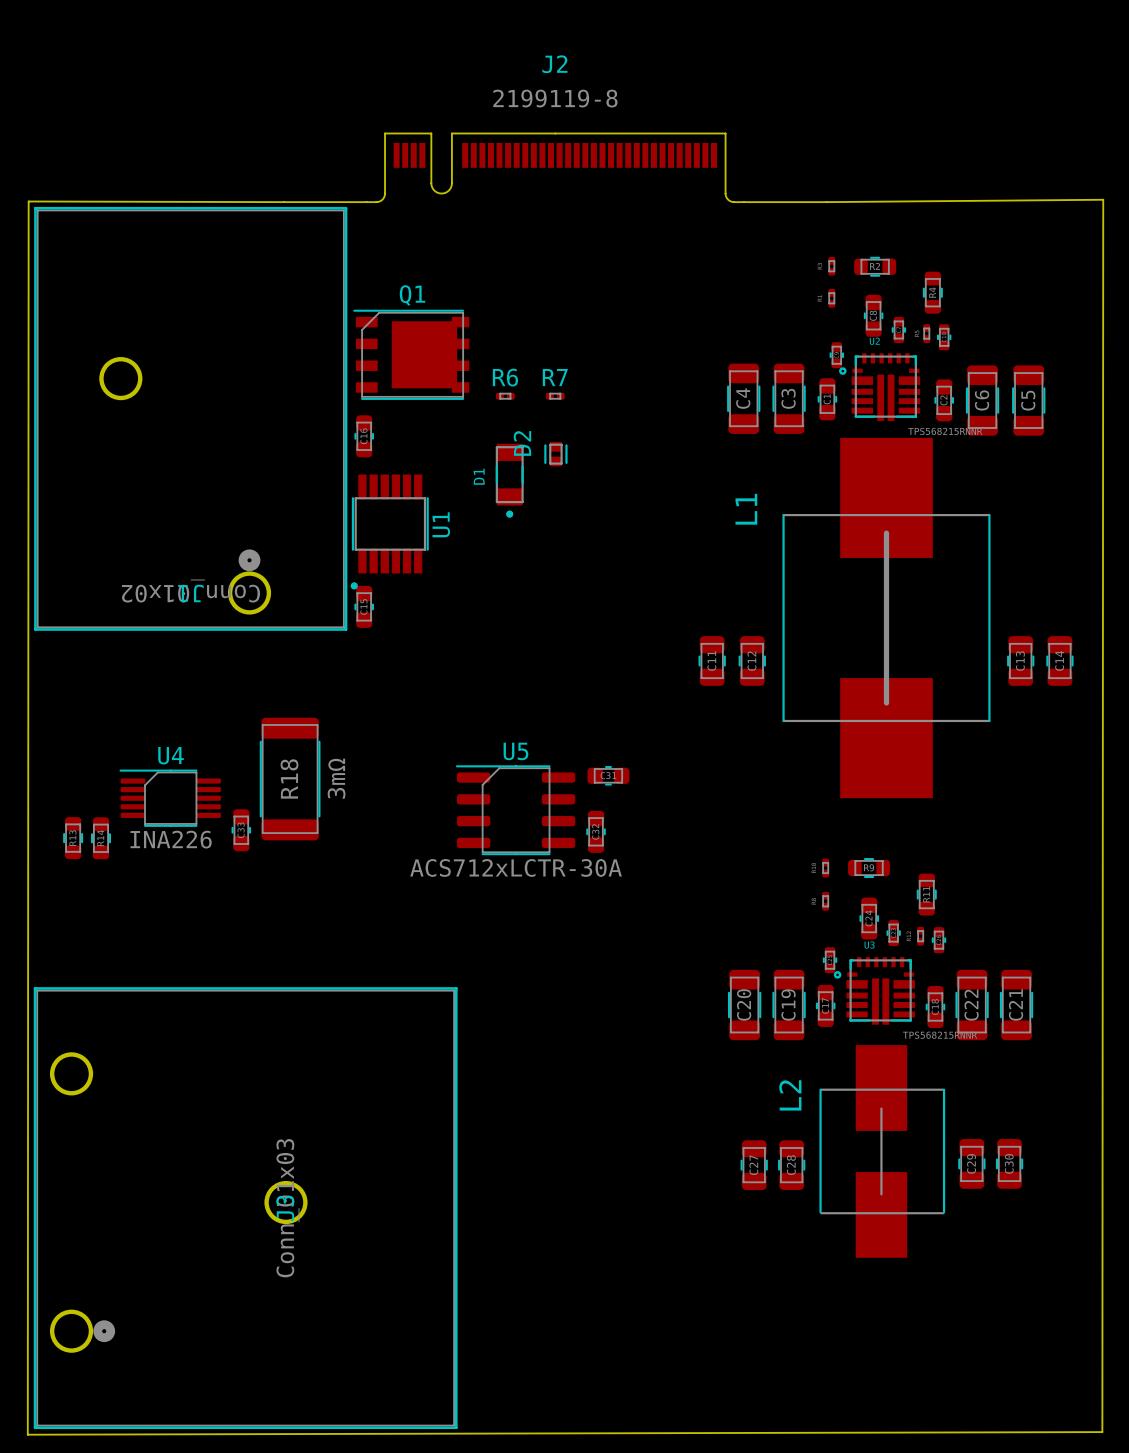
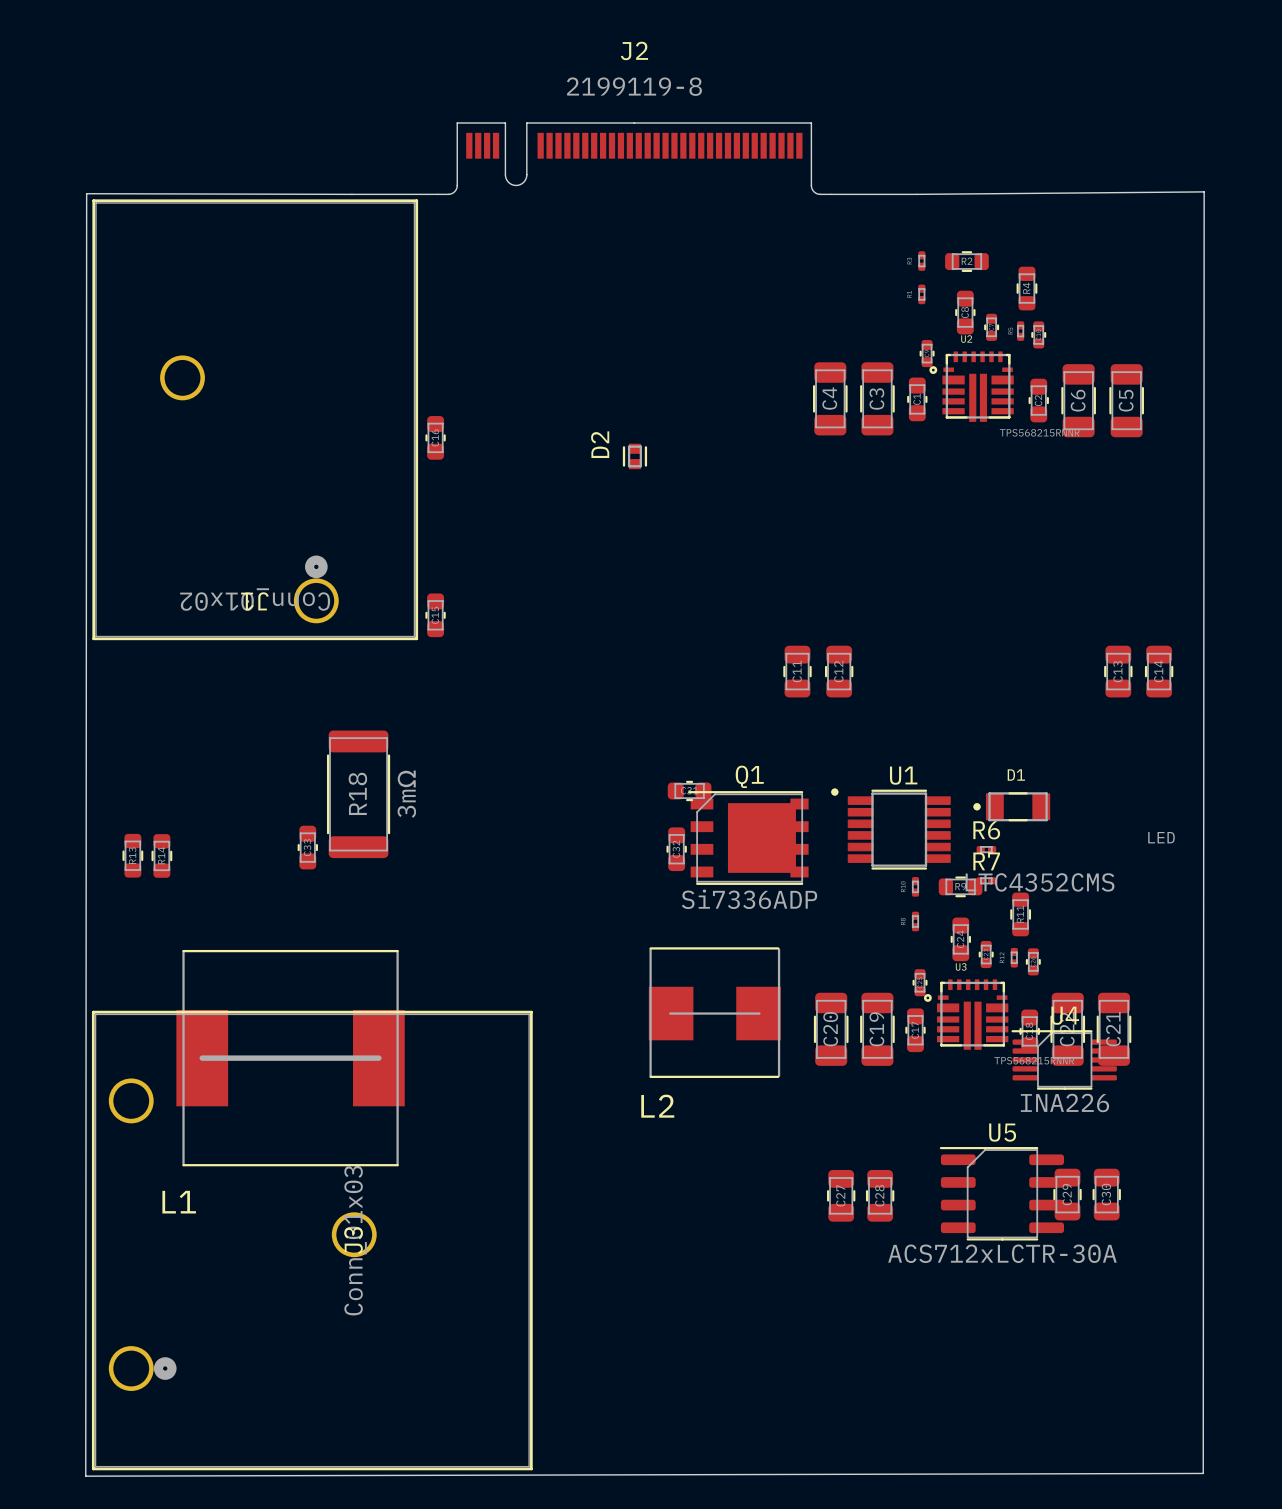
Q1 position: (411, 354) -> (748, 838)
R6 position: (505, 396) -> (986, 849)
R7 position: (555, 396) -> (986, 880)
L1 footprint: [782, 437, 991, 799] -> [176, 949, 405, 1167]
D1 rotation: 0° (509, 480) -> 90° clockwise (1011, 806)
D1 position: (509, 480) -> (1011, 806)
L1 name position: L1 (746, 509) -> L1 (179, 1202)
U1 name position: U1 (441, 524) -> U1 (903, 775)
U1 rotation: 0° (389, 531) -> 90° clockwise (890, 829)
U1 position: (389, 531) -> (890, 829)
U4 position: (170, 798) -> (1064, 1059)
U5 position: (515, 810) -> (1001, 1193)
D1 value: none -> LED (1161, 837)
U1 value: none -> LTC4352CMS (1039, 882)
Q1 value: none -> Si7336ADP (749, 899)
L2 footprint: [819, 1045, 946, 1258] -> [648, 947, 781, 1079]
L2 name position: L2 (790, 1095) -> L2 (657, 1106)

